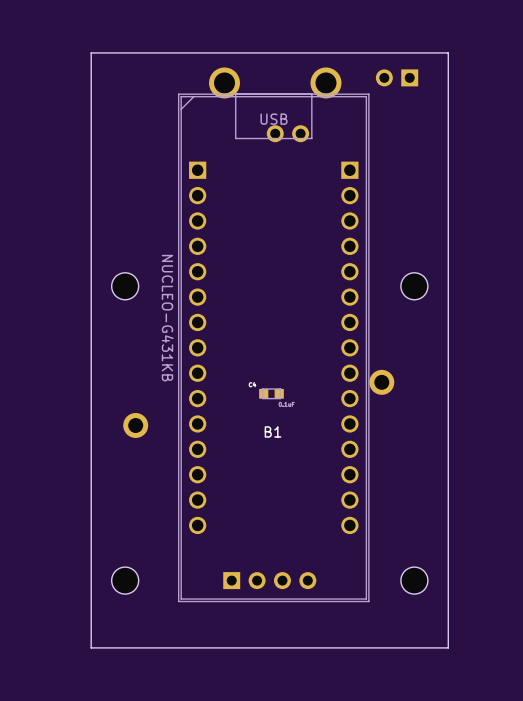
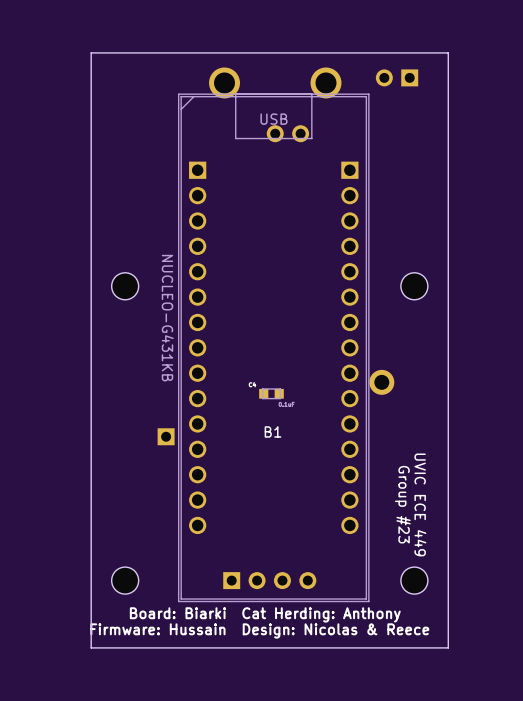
part: (135, 425) -> none
part: none -> (166, 436)
text: none -> Group #23 (402, 504)
text: none -> UVIC ECE 449 (420, 504)
text: none -> Board: Biarki (177, 613)
text: none -> Cat Herding: Anthony (321, 614)
text: none -> Firmware: Hussain (157, 629)
text: none -> Design: Nicolas & Reece (336, 630)

